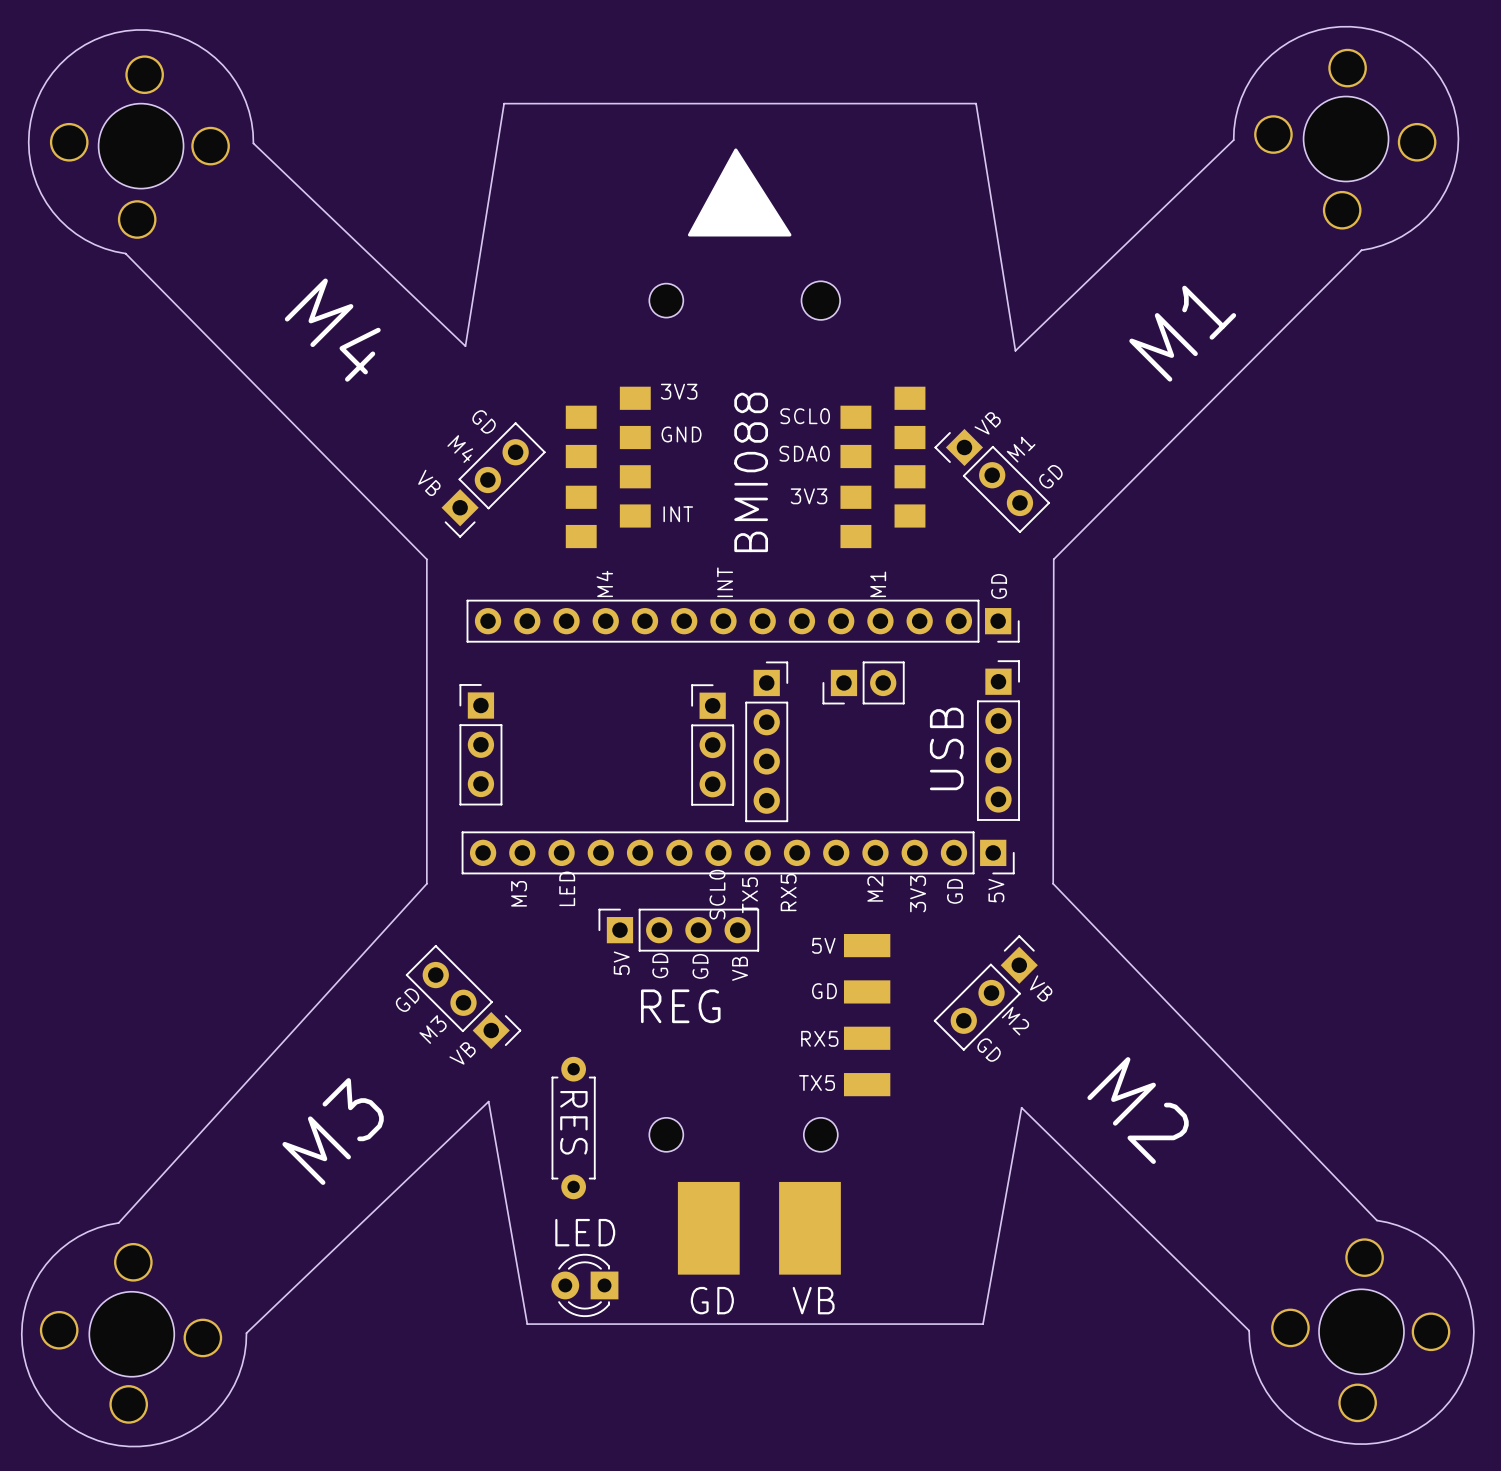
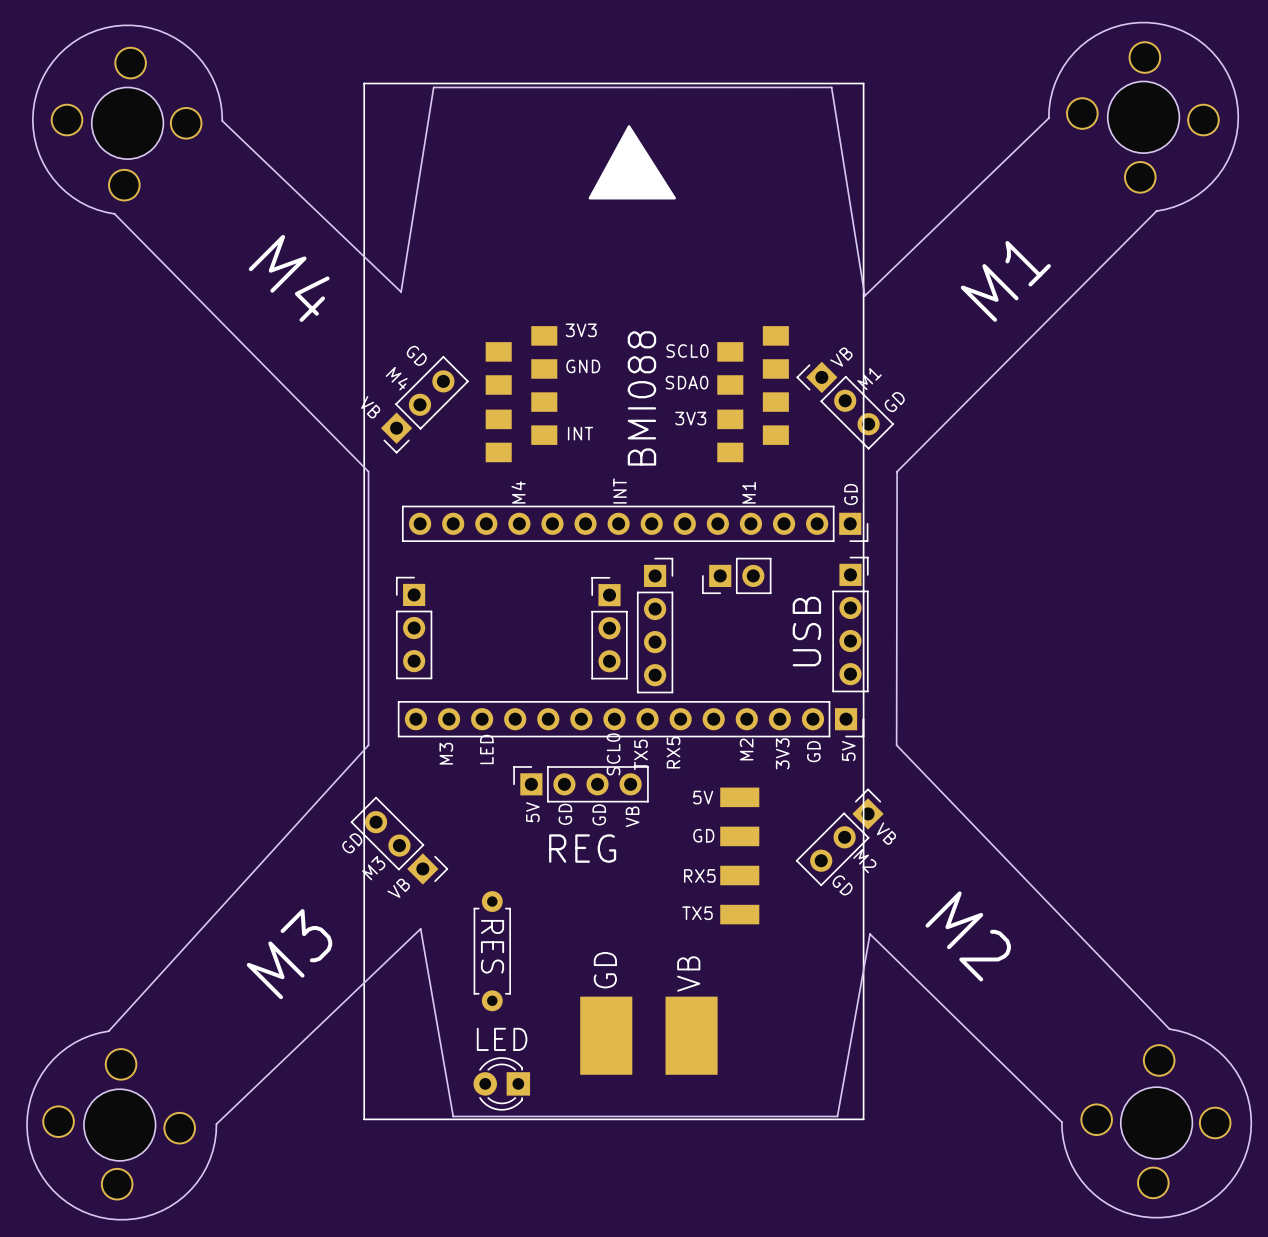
line: none -> (364, 83) (863, 83) (863, 1119) (364, 1119) (364, 83)
part: (666, 300) -> none
part: (820, 300) -> none
part: (666, 1134) -> none
part: (820, 1134) -> none
text rotation: 0° (712, 1300) -> 90° counterclockwise (605, 970)
text position: GD (712, 1300) -> GD (605, 970)
text rotation: 0° (813, 1300) -> 90° counterclockwise (688, 974)
text position: VB (813, 1300) -> VB (688, 974)

